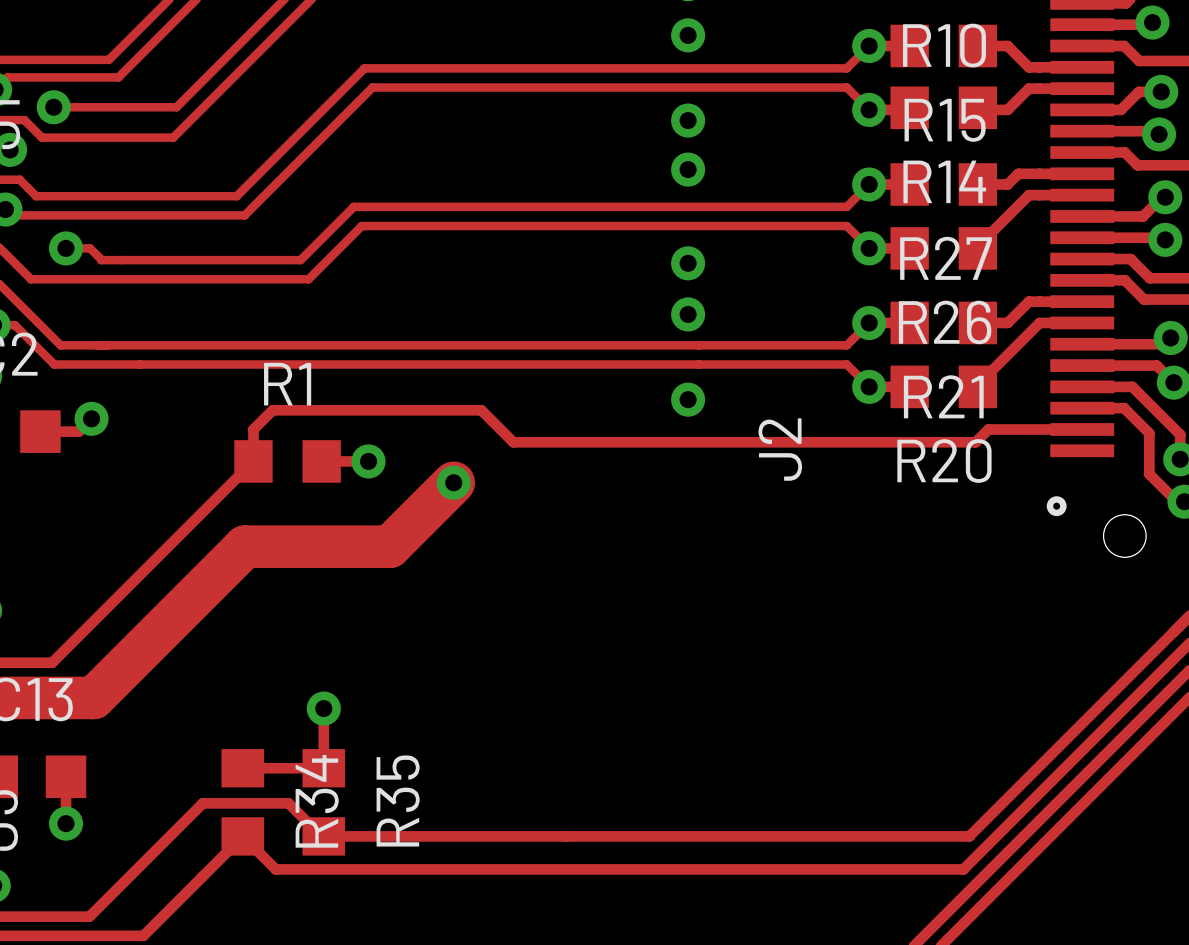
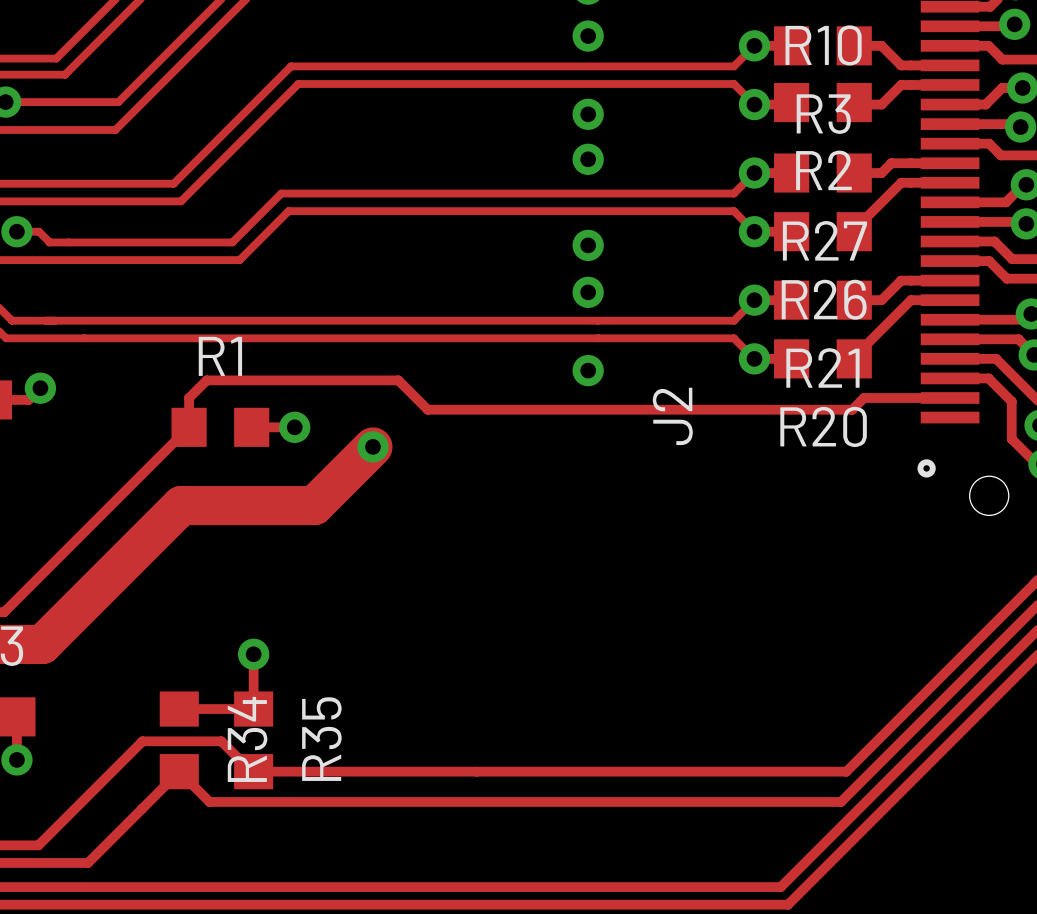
R15 name: R15 (945, 120) -> R3 (823, 114)
R14 name: R14 (944, 181) -> R2 (823, 170)

